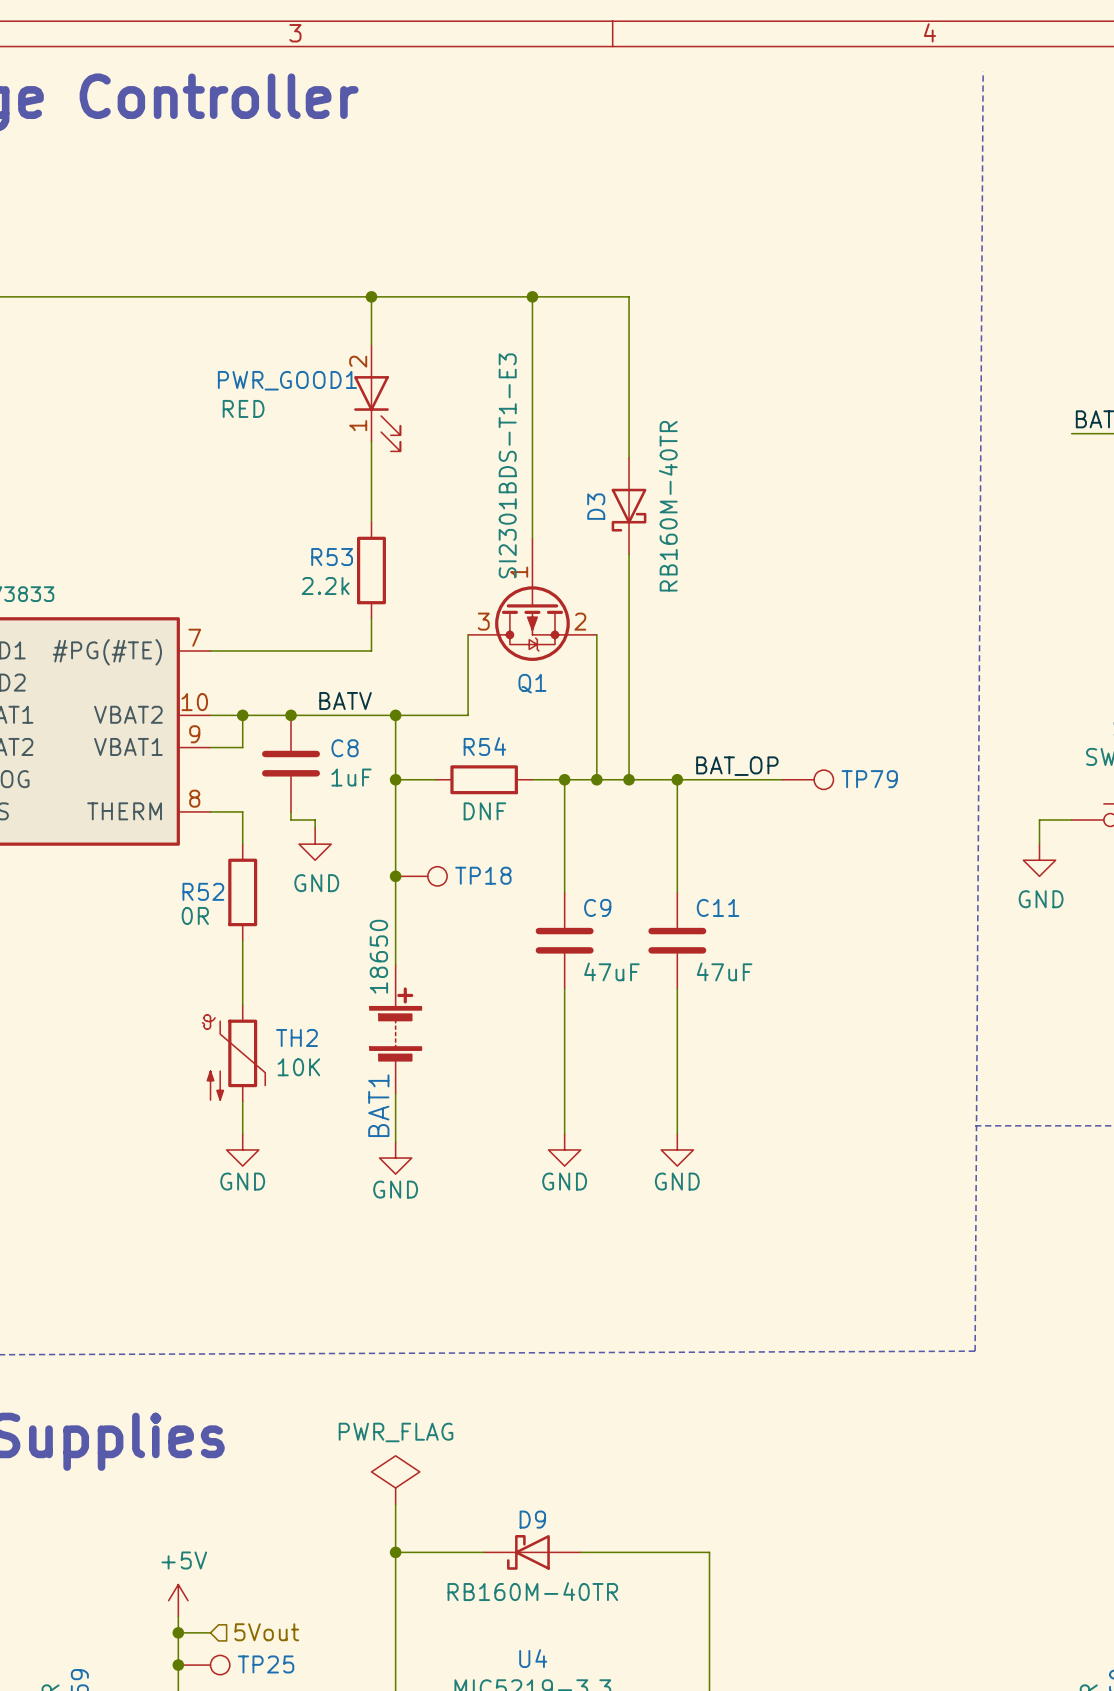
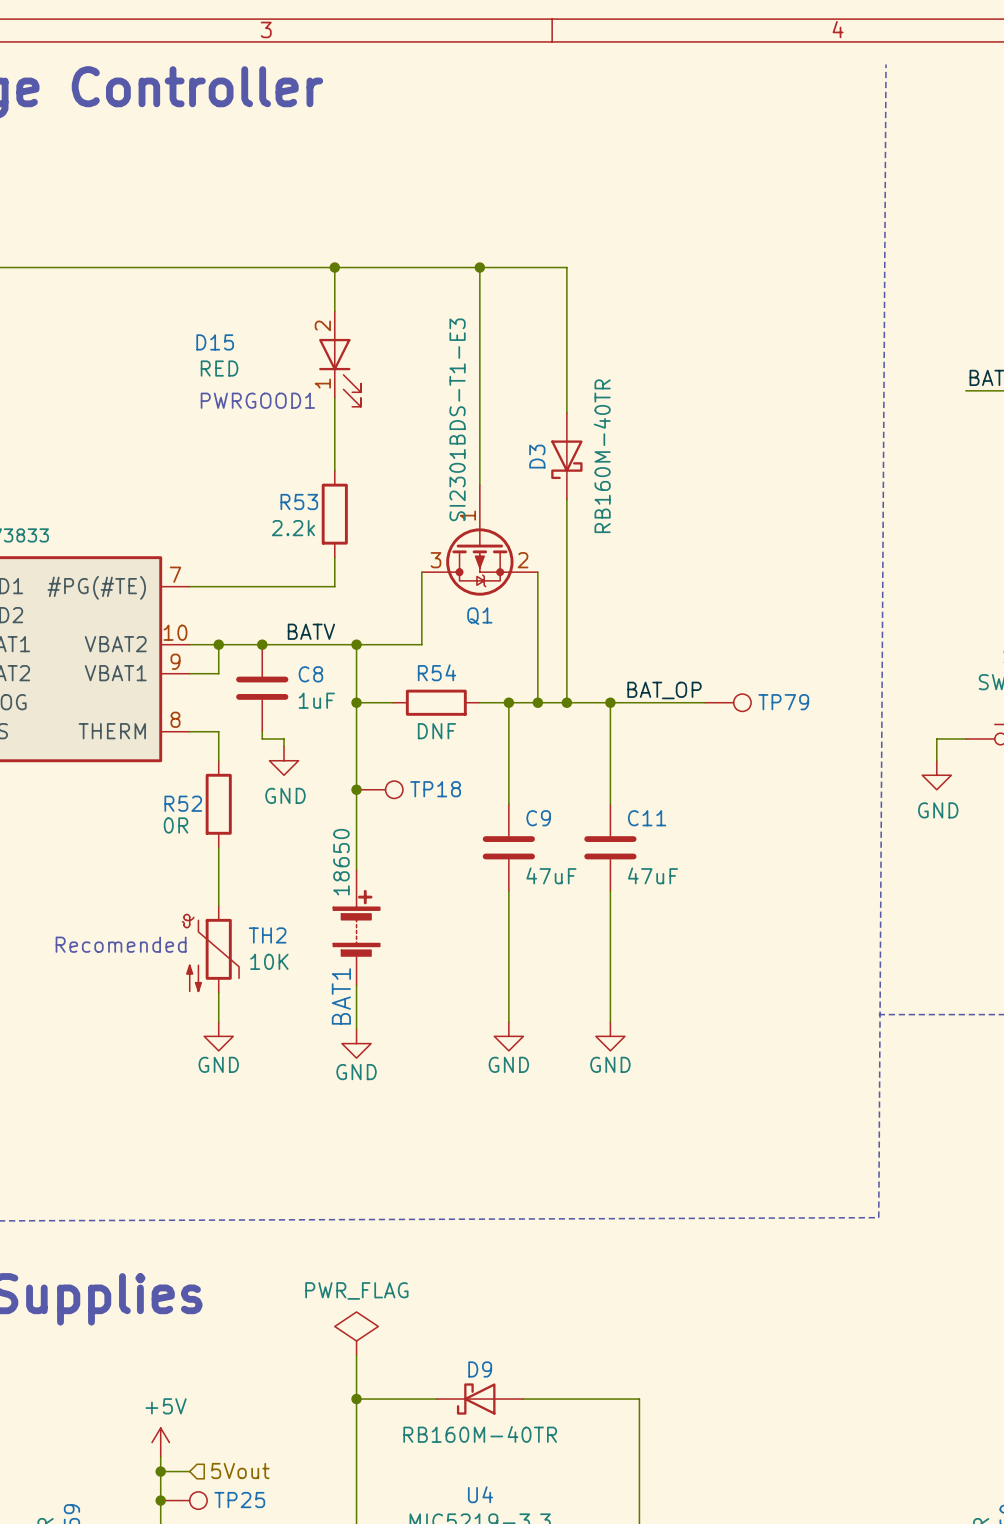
PWR_GOOD1 name: PWR_GOOD1 (287, 380) -> D15 (215, 342)
text: none -> PWRGOOD1 (257, 400)
text: none -> Recomended (121, 944)

